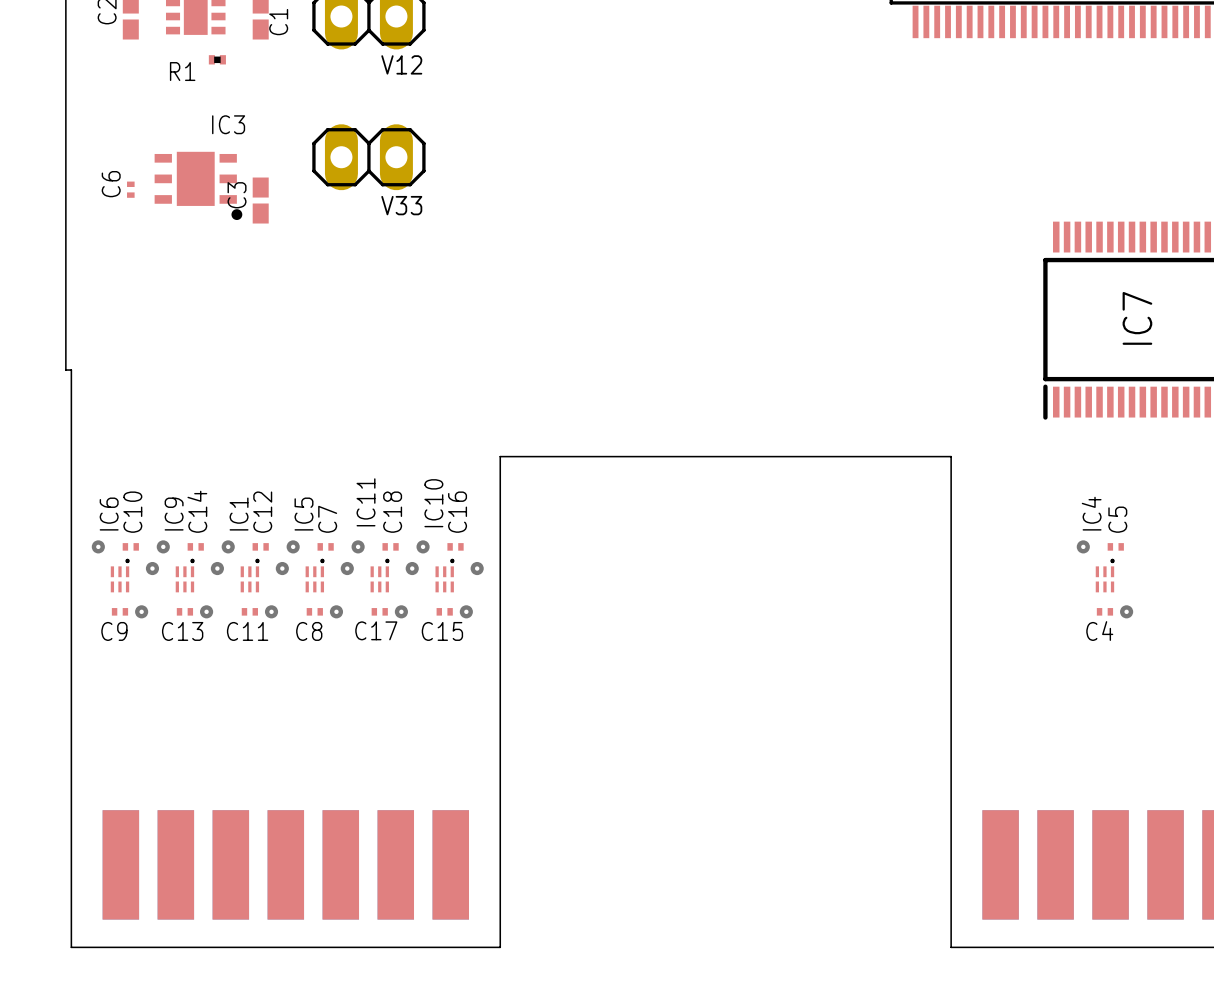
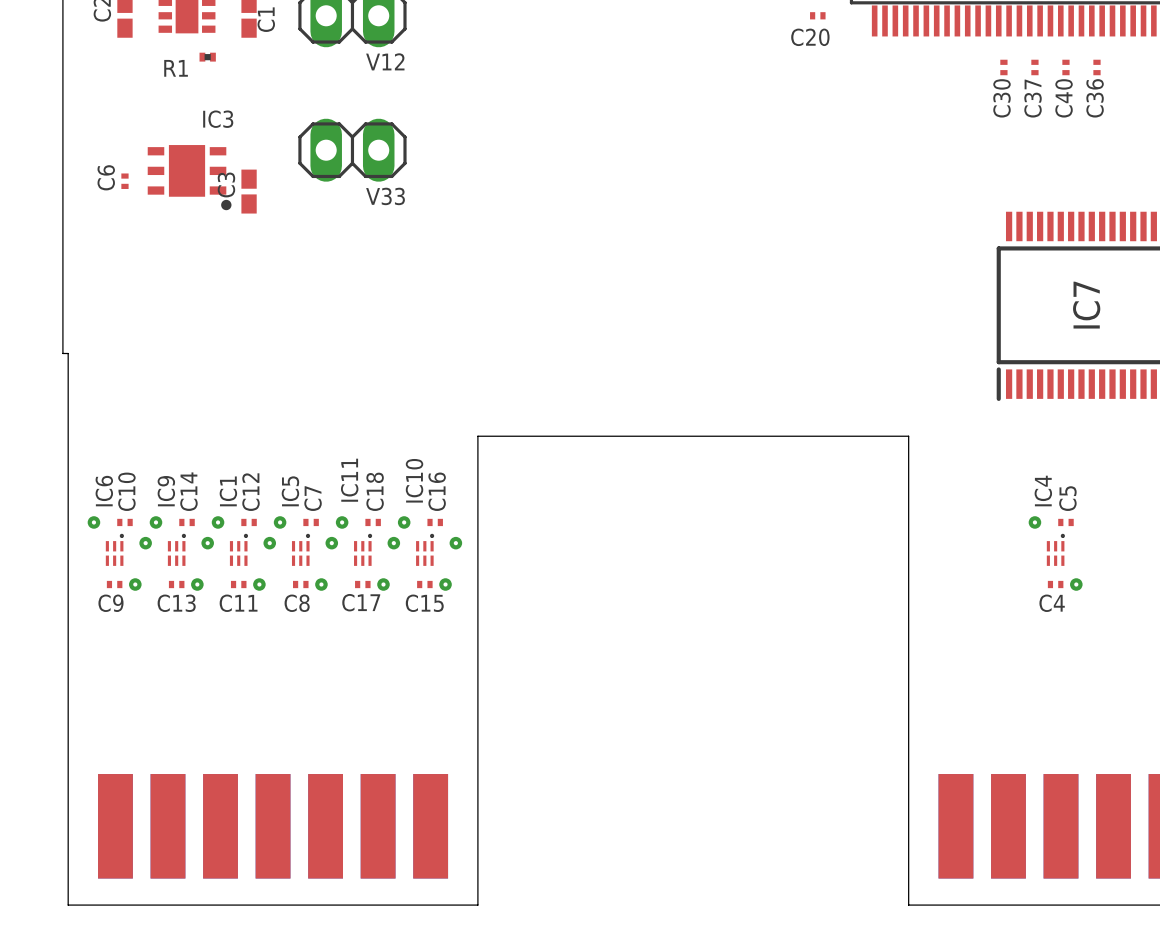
C20: none -> (817, 15)
C30: none -> (1003, 67)
C37: none -> (1034, 67)
C40: none -> (1065, 67)
C36: none -> (1096, 67)

